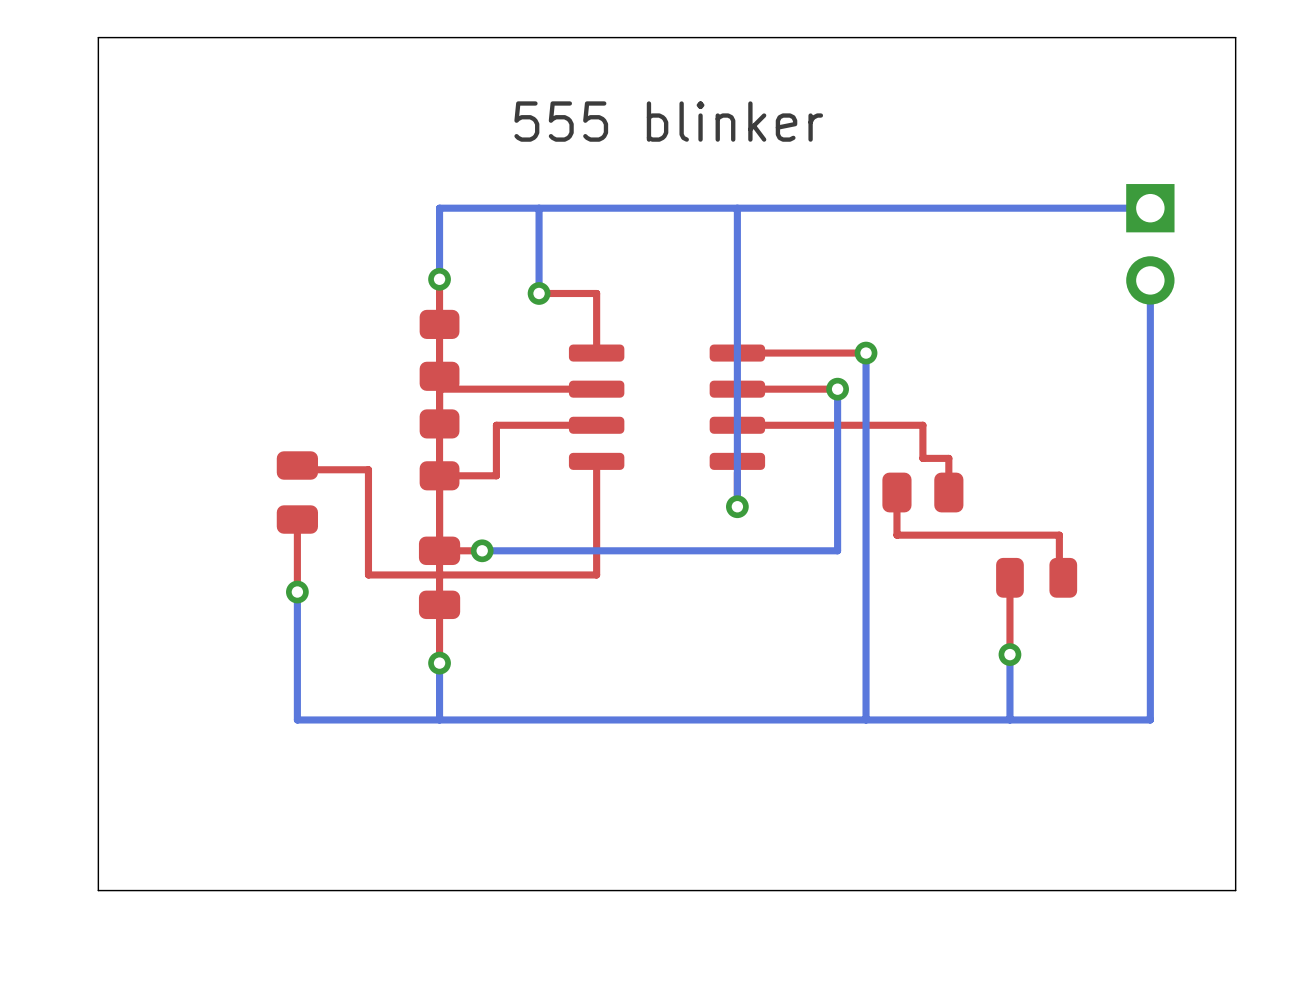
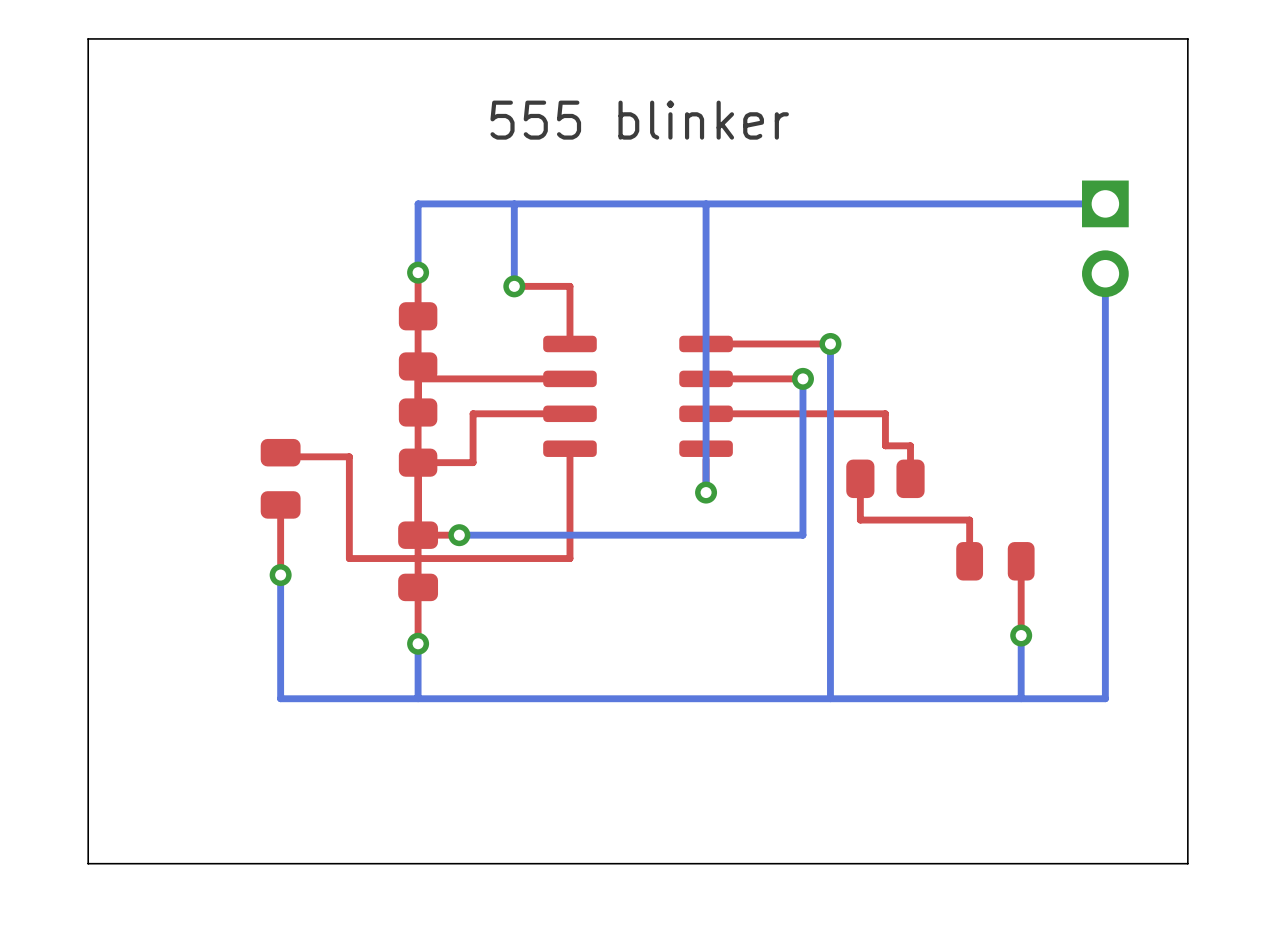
top track: (1009, 535) (1059, 535) (1059, 574) -> (969, 520) (969, 558)
top track: (1009, 592) (1009, 654) -> (1021, 575) (1021, 635)
bottom track: (1009, 654) (1009, 719) -> (1021, 635) (1021, 698)
via position: (1009, 654) -> (1021, 635)

